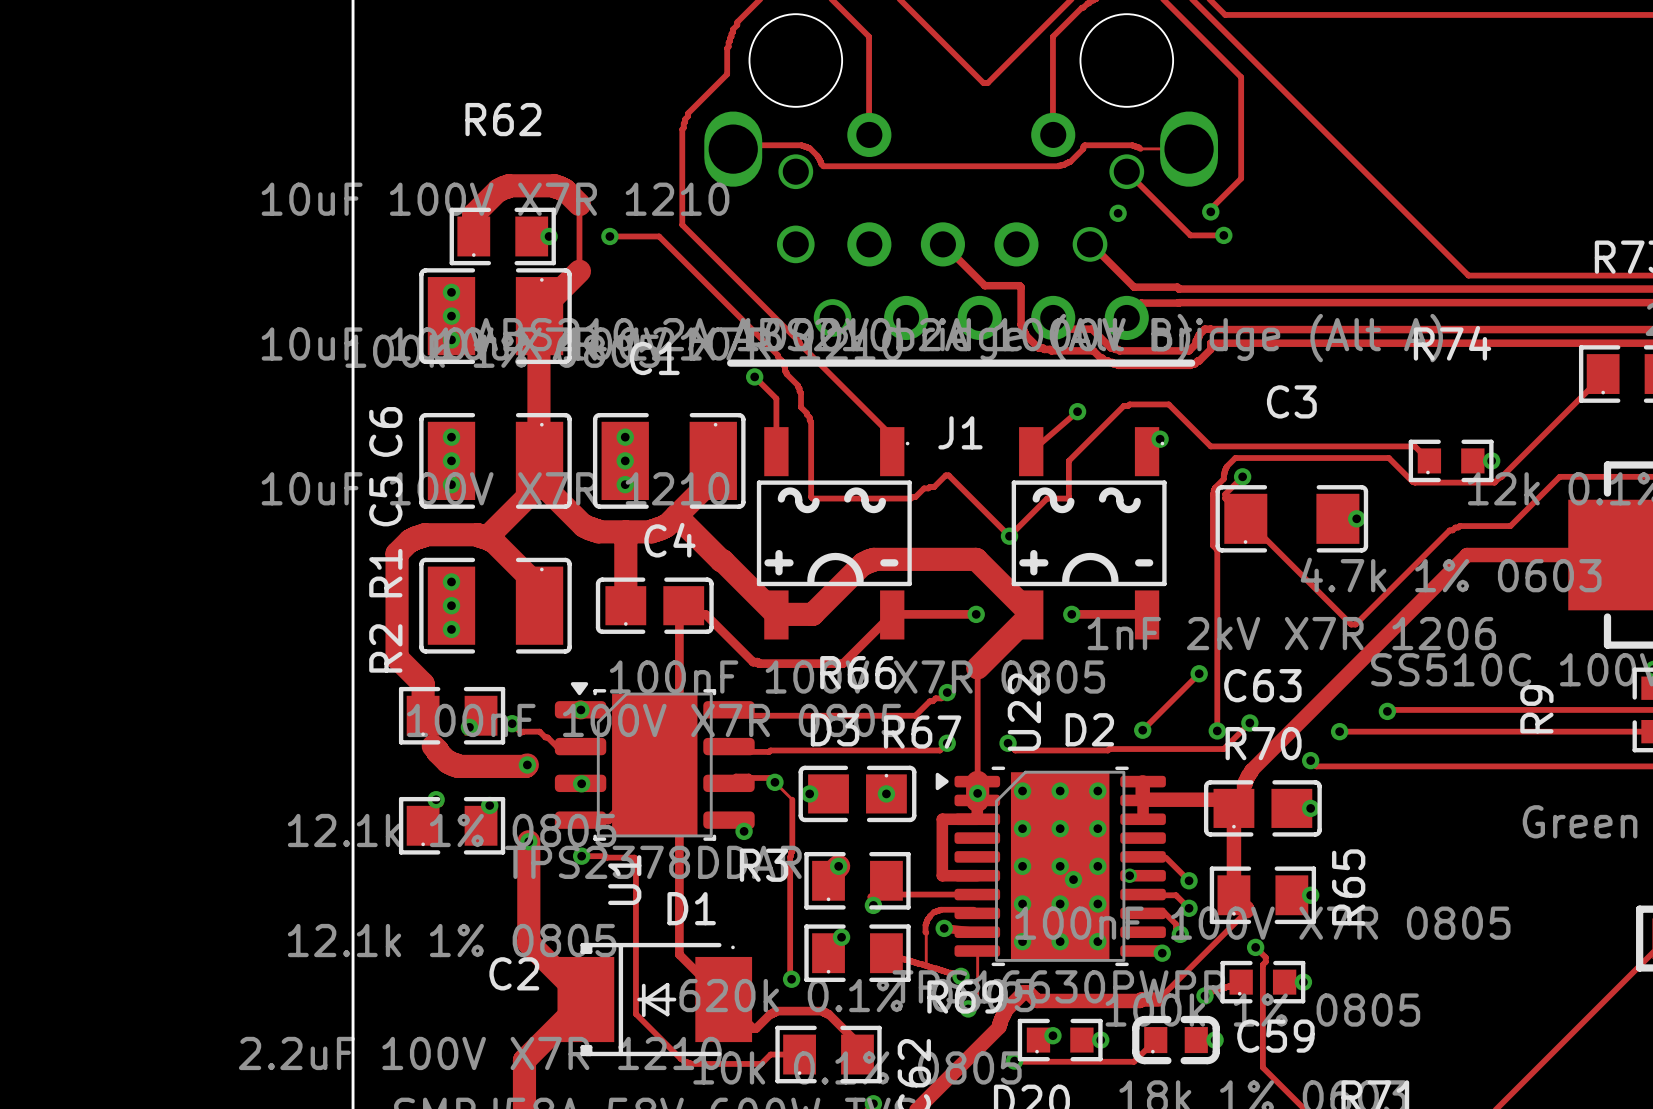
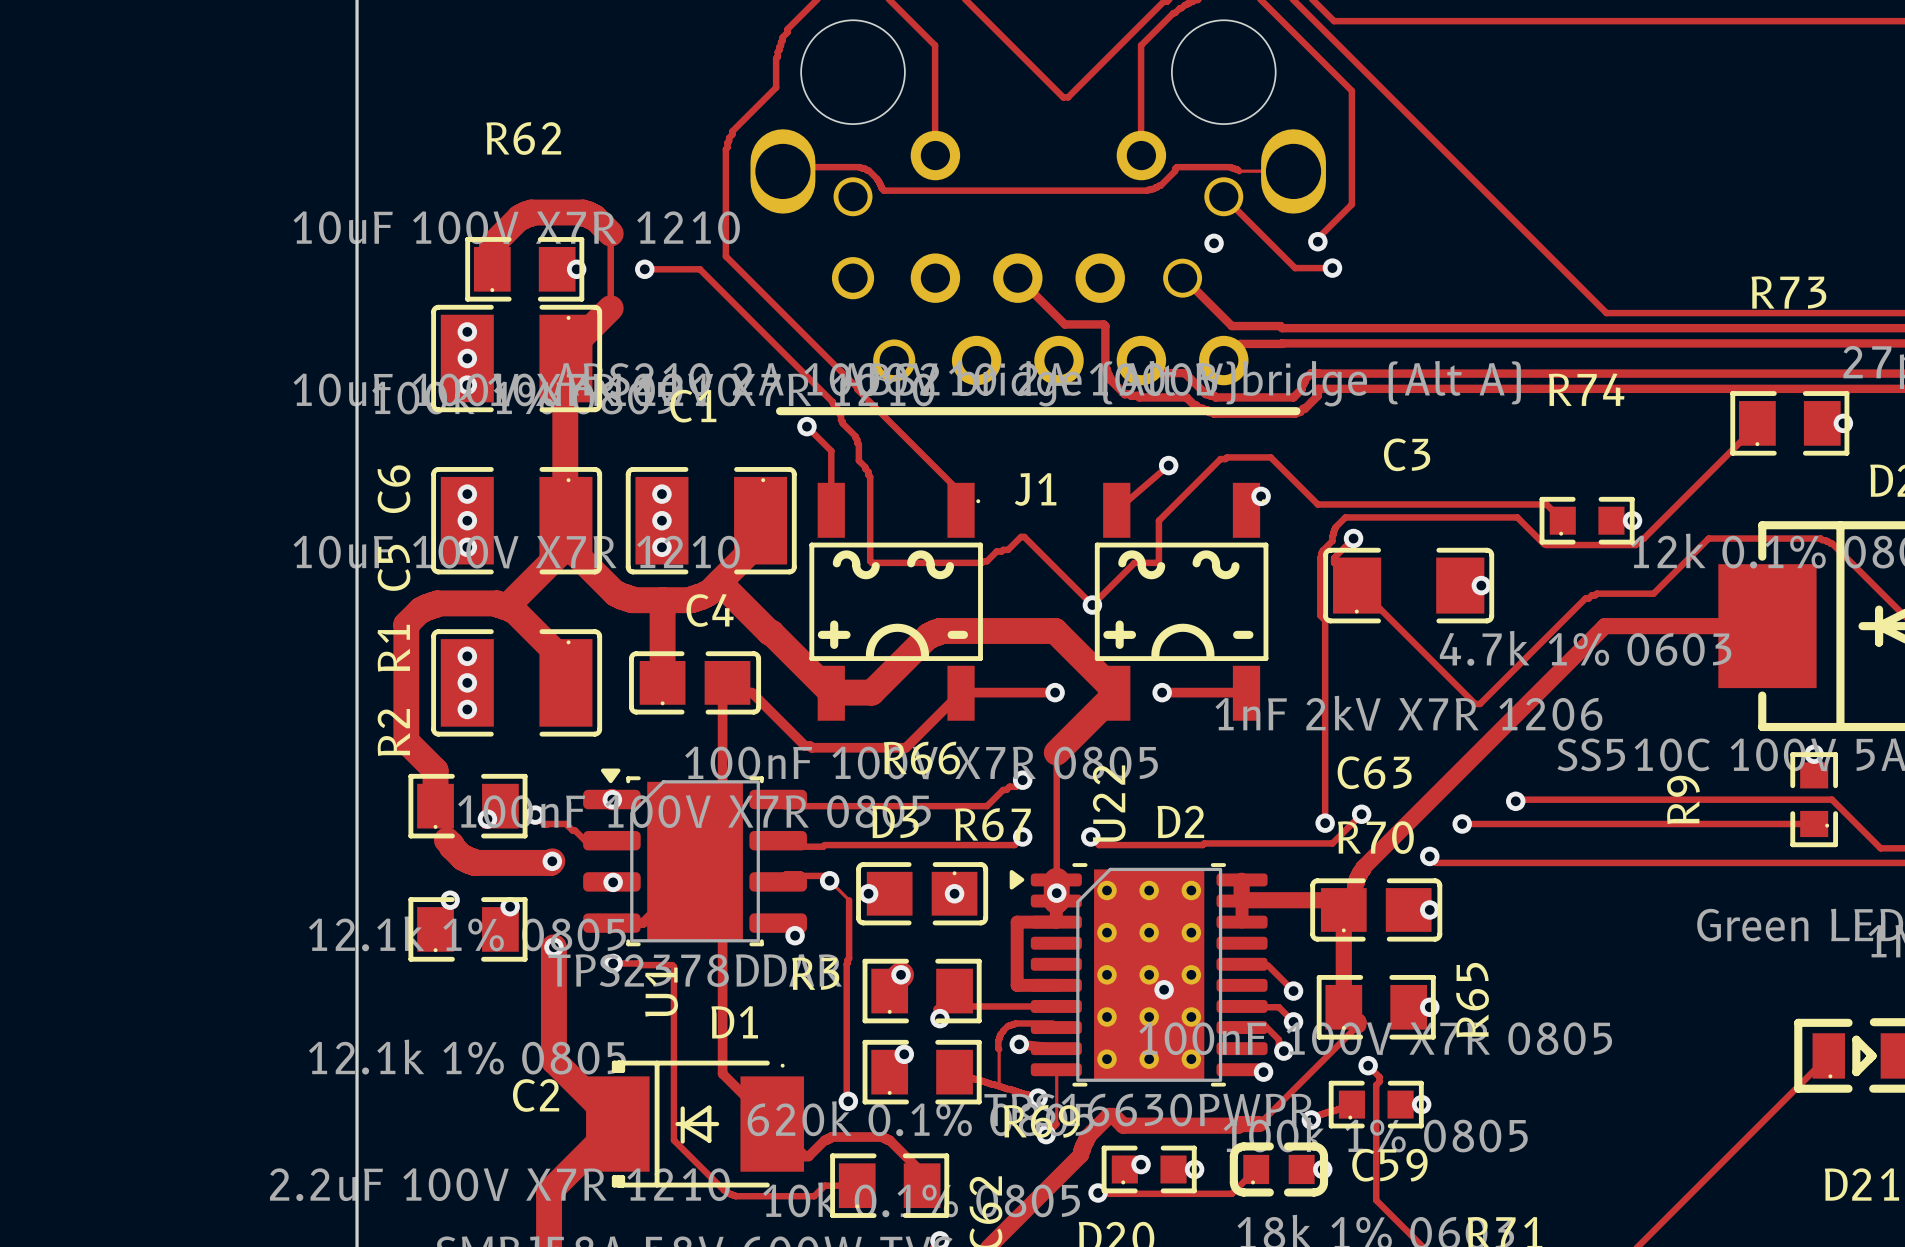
track: (1199, 673) (1142, 730) -> none
via: (1199, 673) -> none
via: (1142, 730) -> none
via: (1129, 875) -> none

